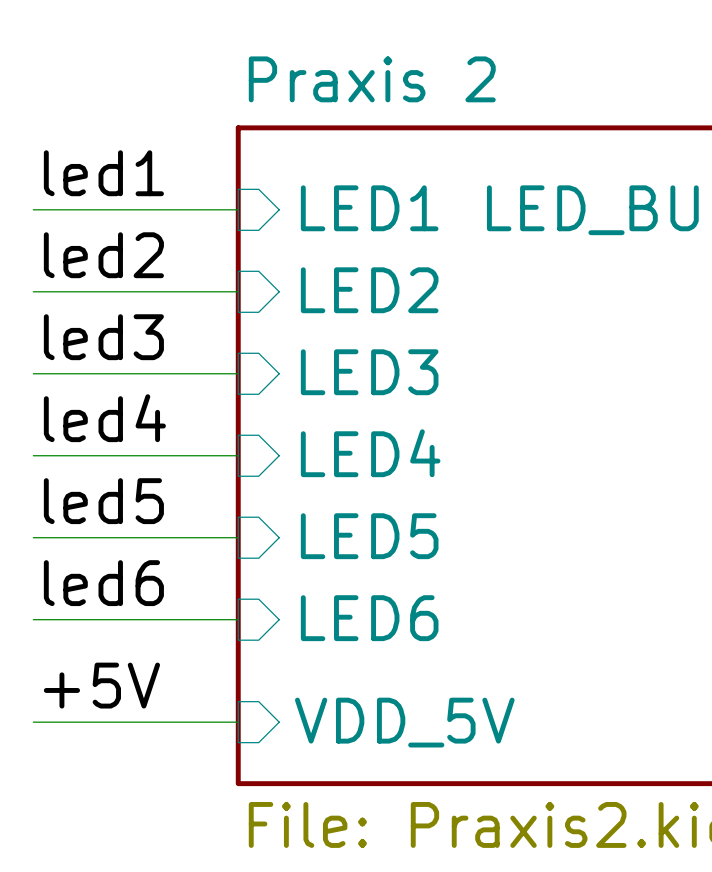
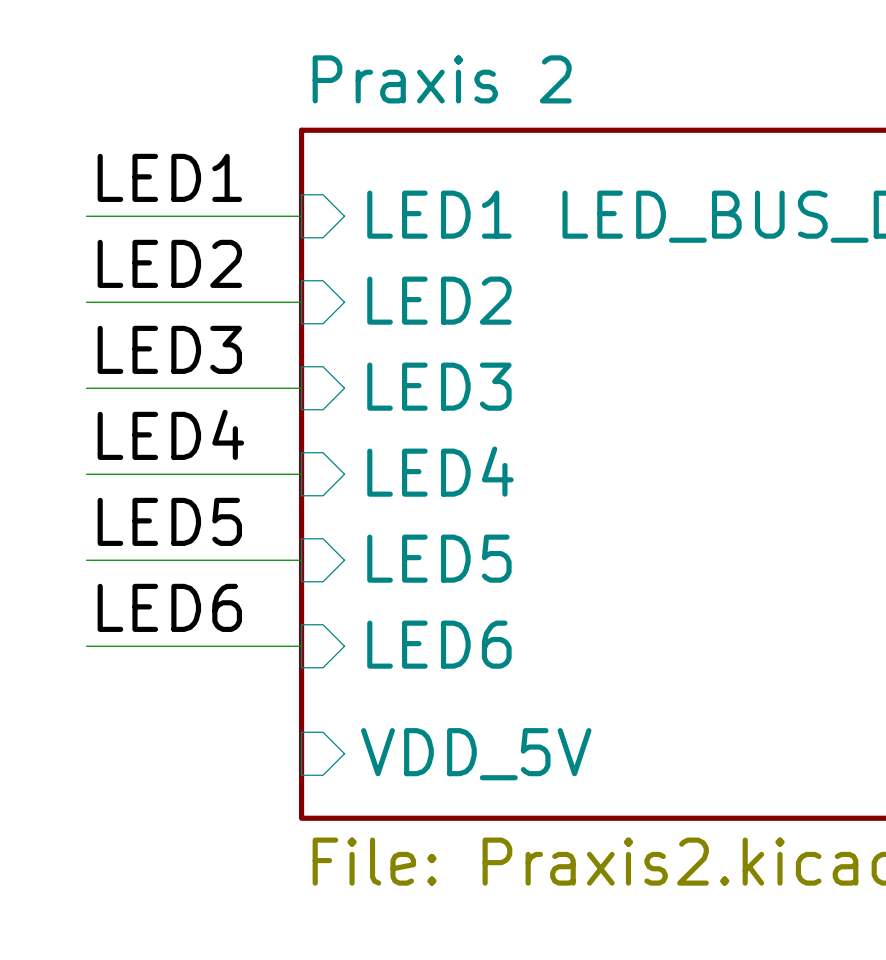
label: led1 (103, 173) -> LED1 (169, 177)
label: led2 (103, 255) -> LED2 (169, 263)
label: led3 (103, 337) -> LED3 (169, 349)
label: led4 (104, 418) -> LED4 (170, 434)
label: led5 (103, 501) -> LED5 (169, 521)
label: led6 (103, 583) -> LED6 (169, 607)
label: +5V (101, 685) -> none
wire: (33, 722) (238, 722) -> none

